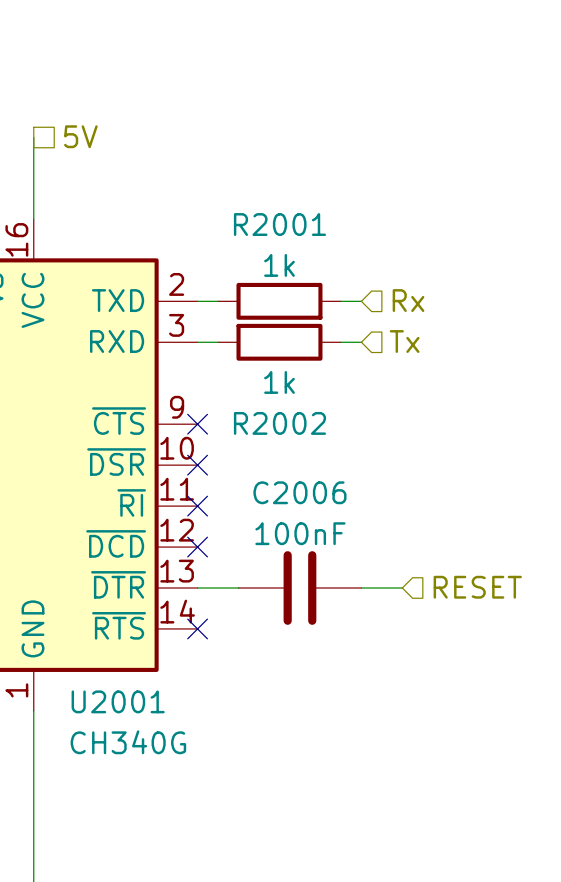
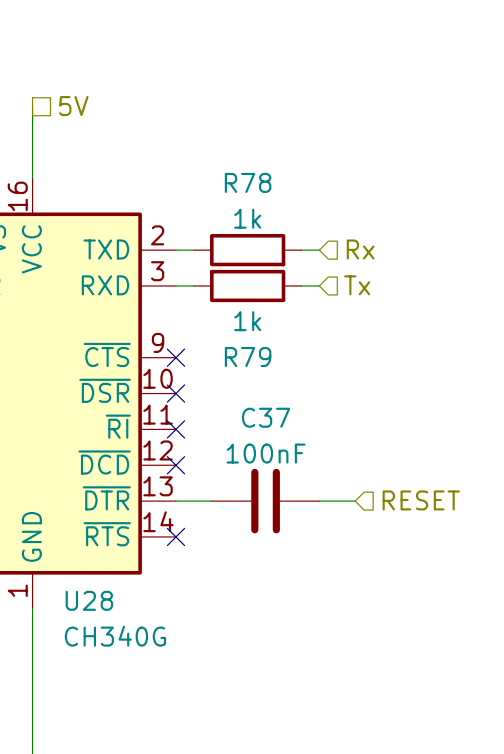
R2001 name: R2001 (279, 224) -> R78 (248, 182)
R2002 name: R2002 (279, 423) -> R79 (248, 357)
C2006 name: C2006 (299, 492) -> C37 (266, 417)
U2001 name: U2001 (118, 701) -> U28 (89, 600)

